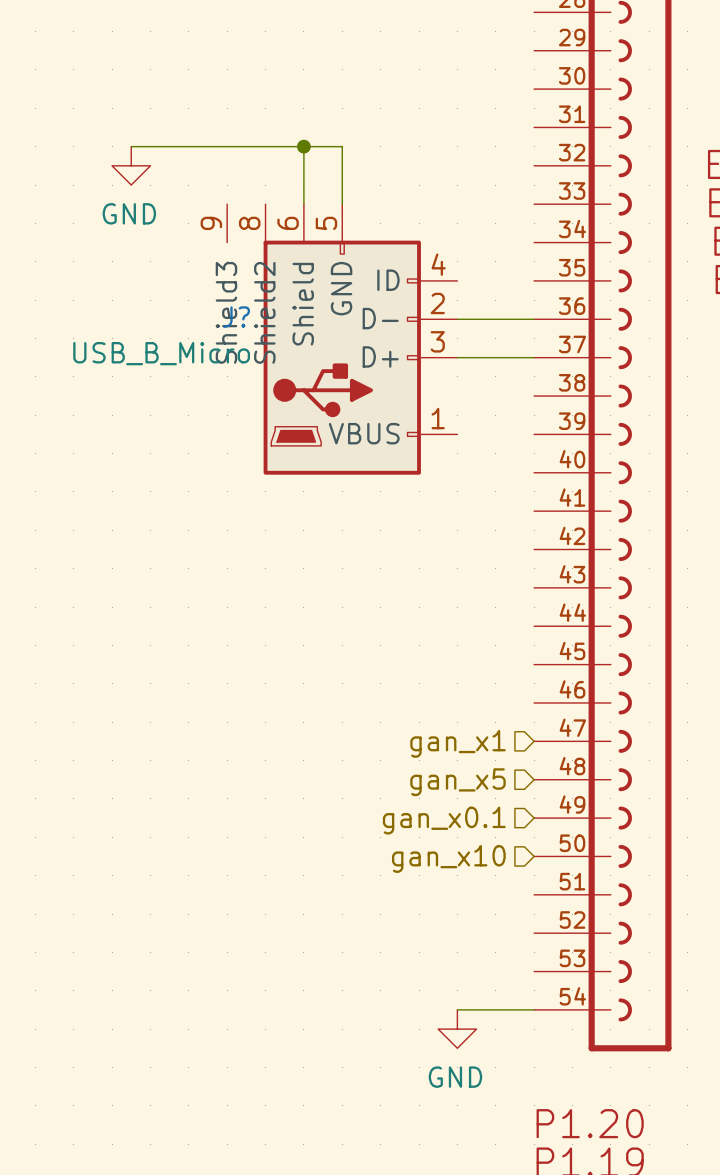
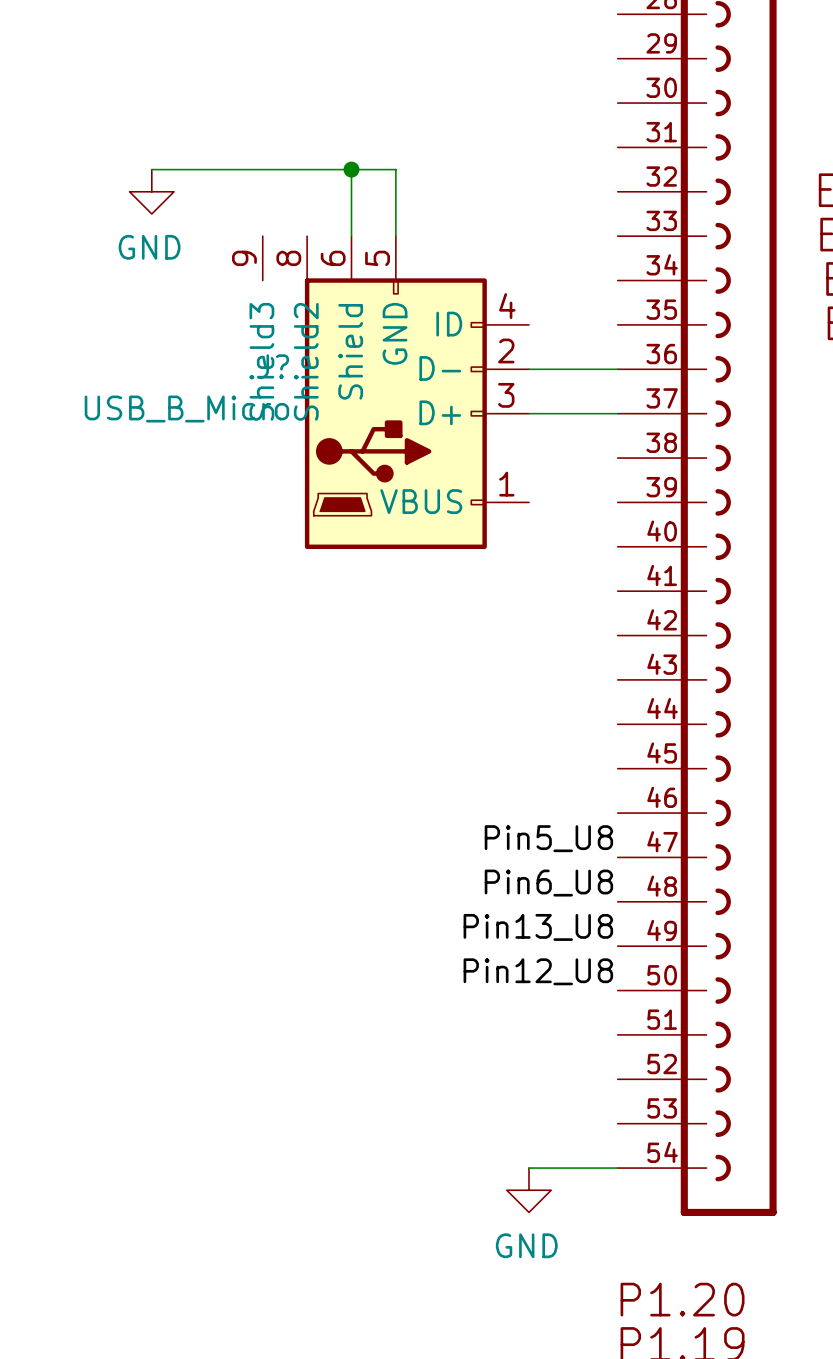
label: none -> Pin5_U8 (548, 838)
hierarchical label: gan_x1 (457, 743) -> none
label: none -> Pin6_U8 (548, 883)
hierarchical label: gan_x5 (457, 782) -> none
label: none -> Pin13_U8 (538, 927)
hierarchical label: gan_x0.1 (444, 820) -> none
label: none -> Pin12_U8 (538, 971)
hierarchical label: gan_x10 (448, 858) -> none

